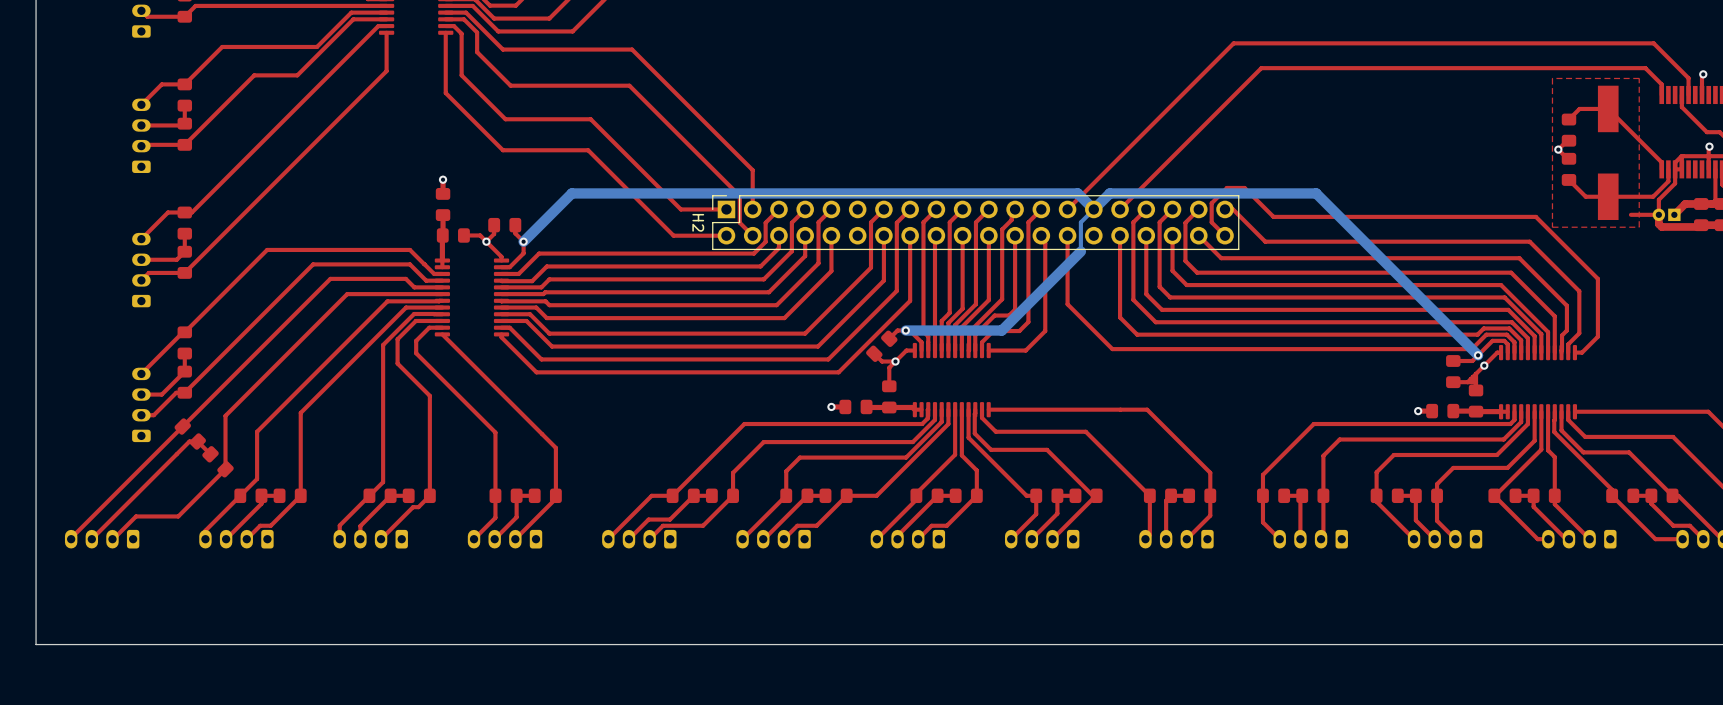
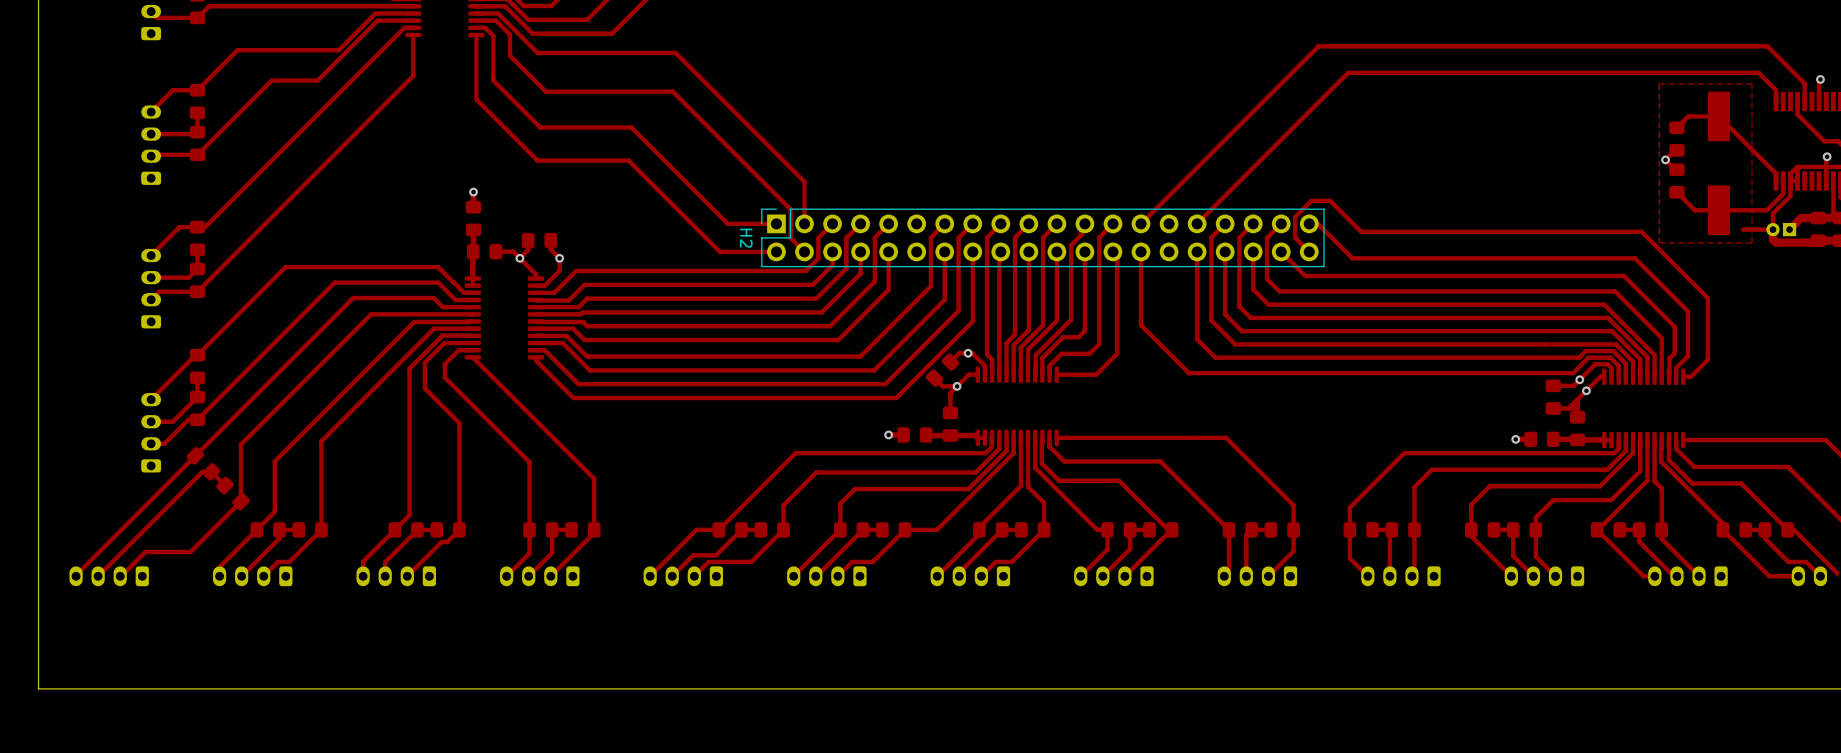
bottom track: (1093, 209) (1109, 193) (1316, 193) (1478, 355) -> none
bottom track: (1093, 209) (1077, 193) (571, 193) (523, 241) -> none
bottom track: (1093, 209) (1080, 222) (1080, 252) -> none
bottom track: (1080, 251) (1001, 330) (905, 330) -> none

